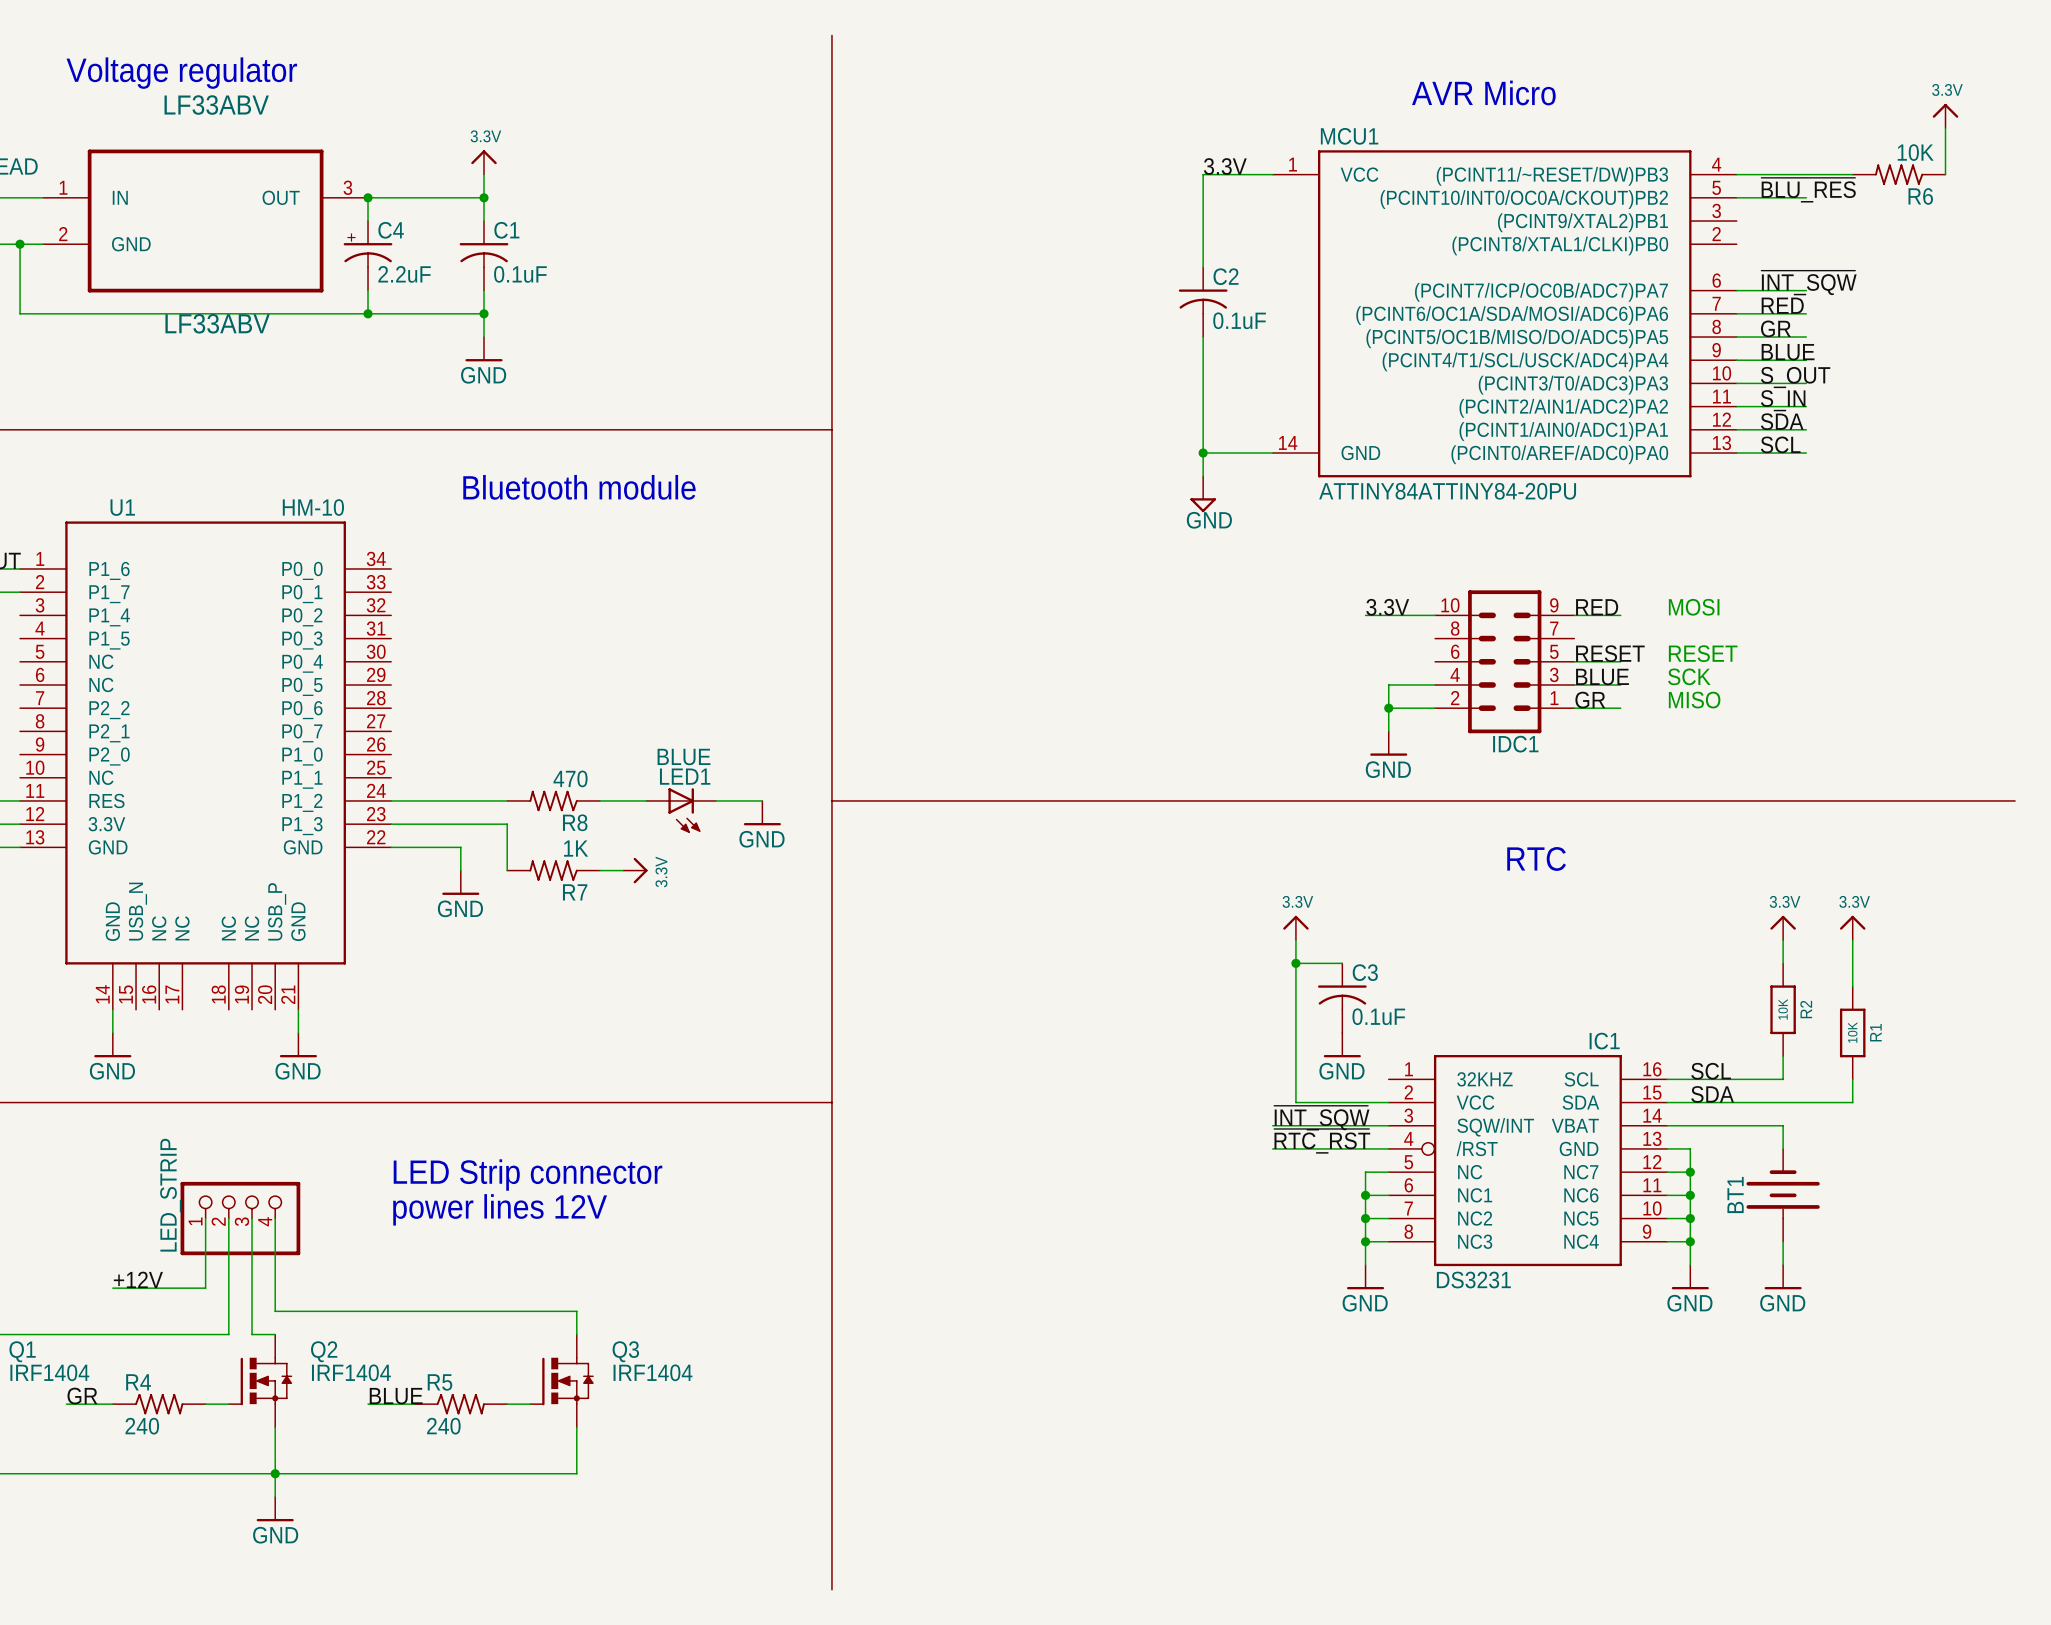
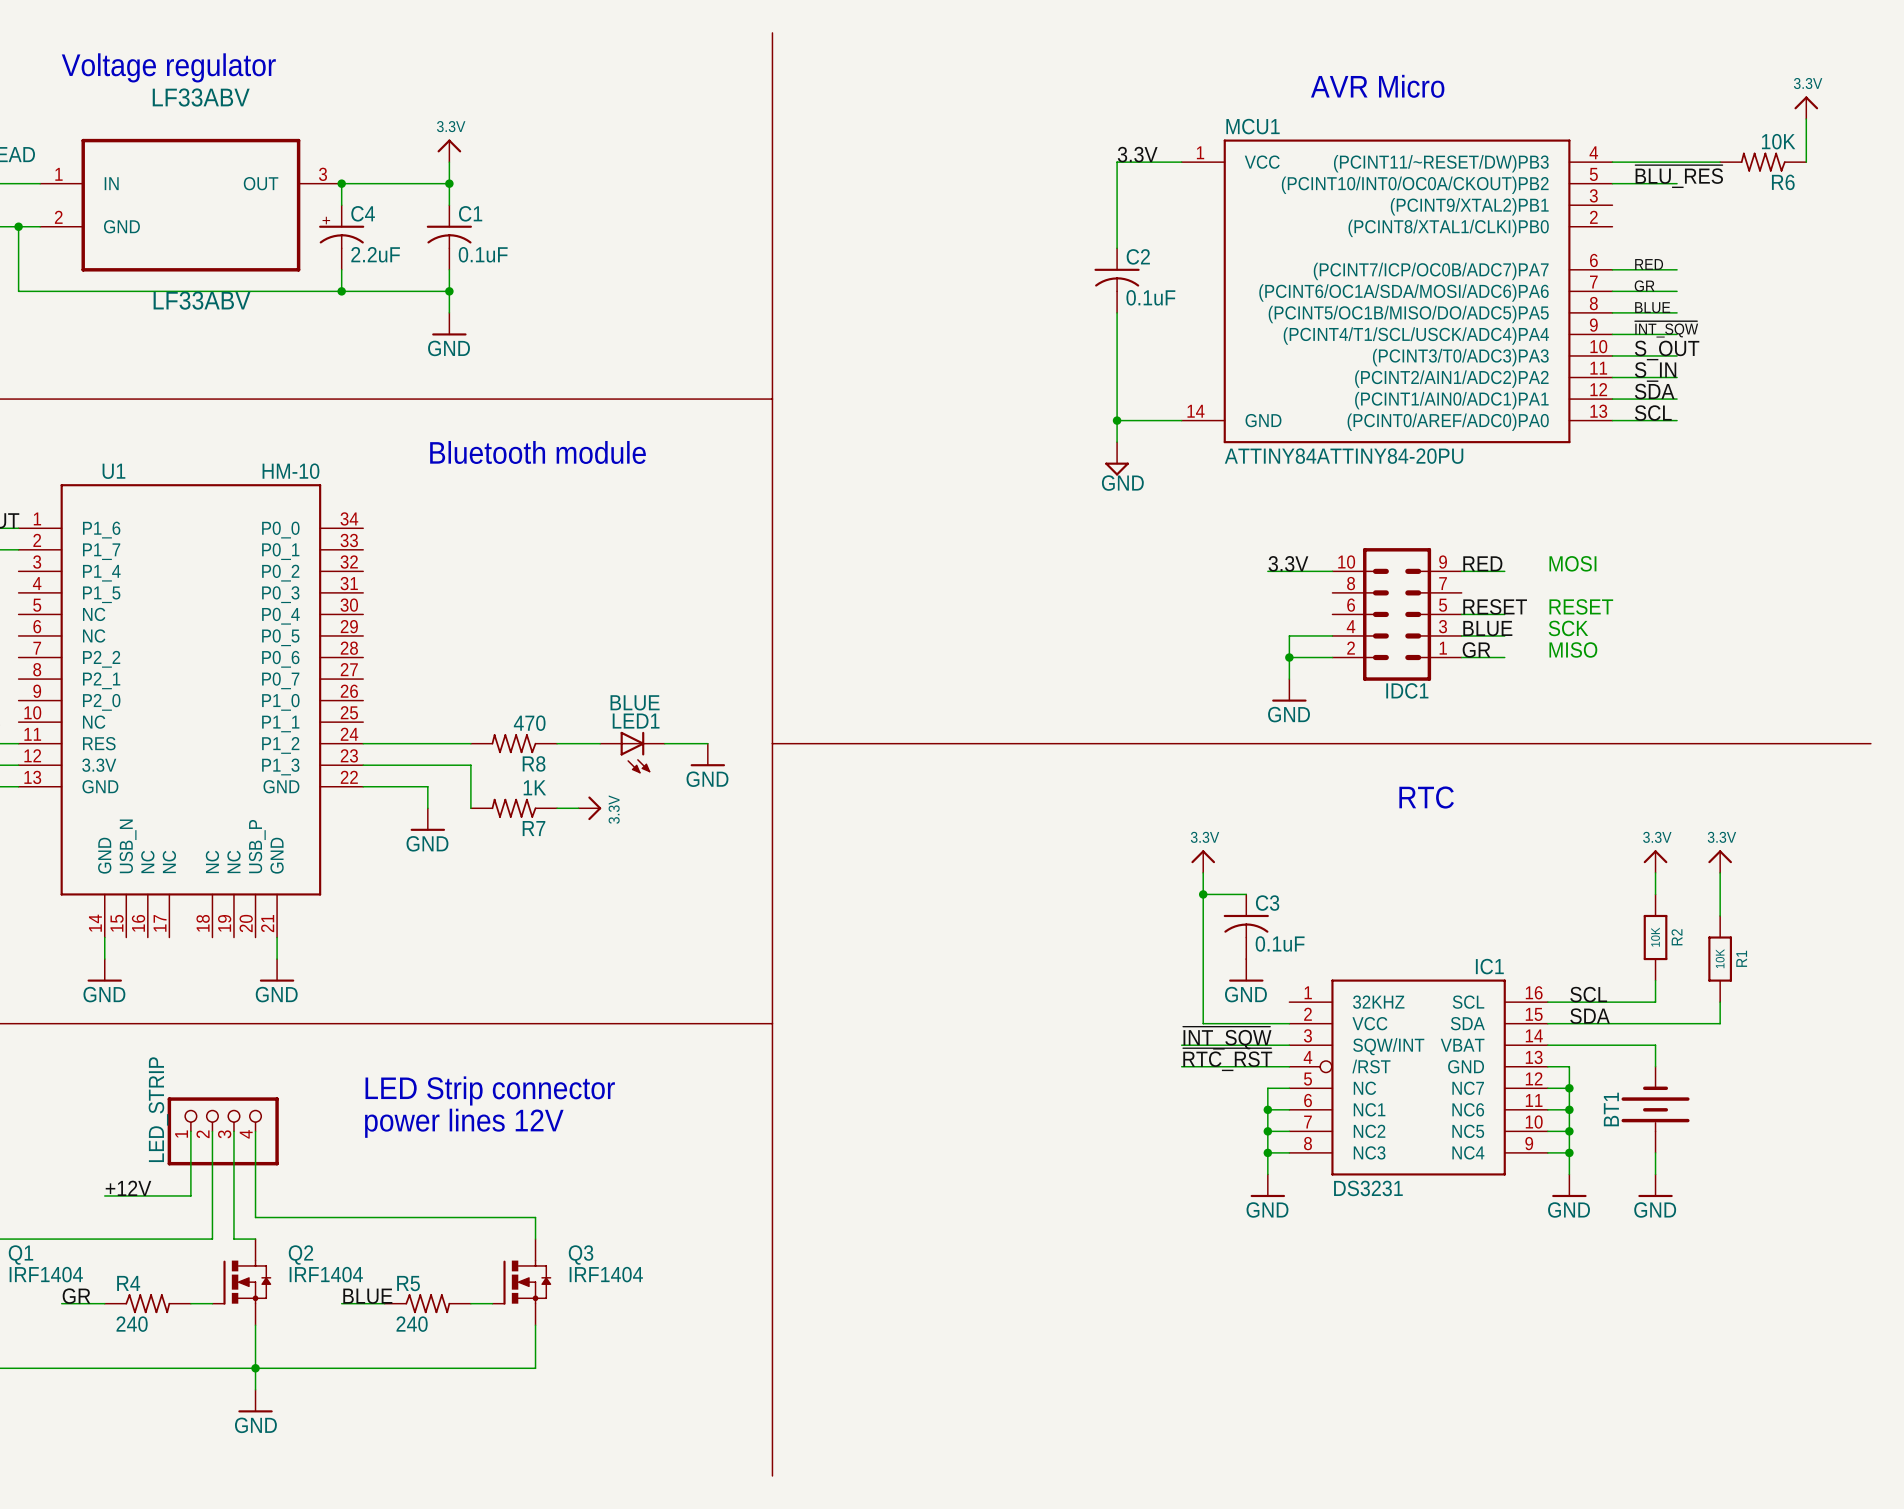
label: ~{INT_SQW} (1809, 282) -> RED (1649, 264)
label: RED (1782, 305) -> GR (1644, 285)
label: GR (1775, 328) -> BLUE (1652, 307)
label: BLUE (1788, 352) -> ~{INT_SQW} (1666, 329)

